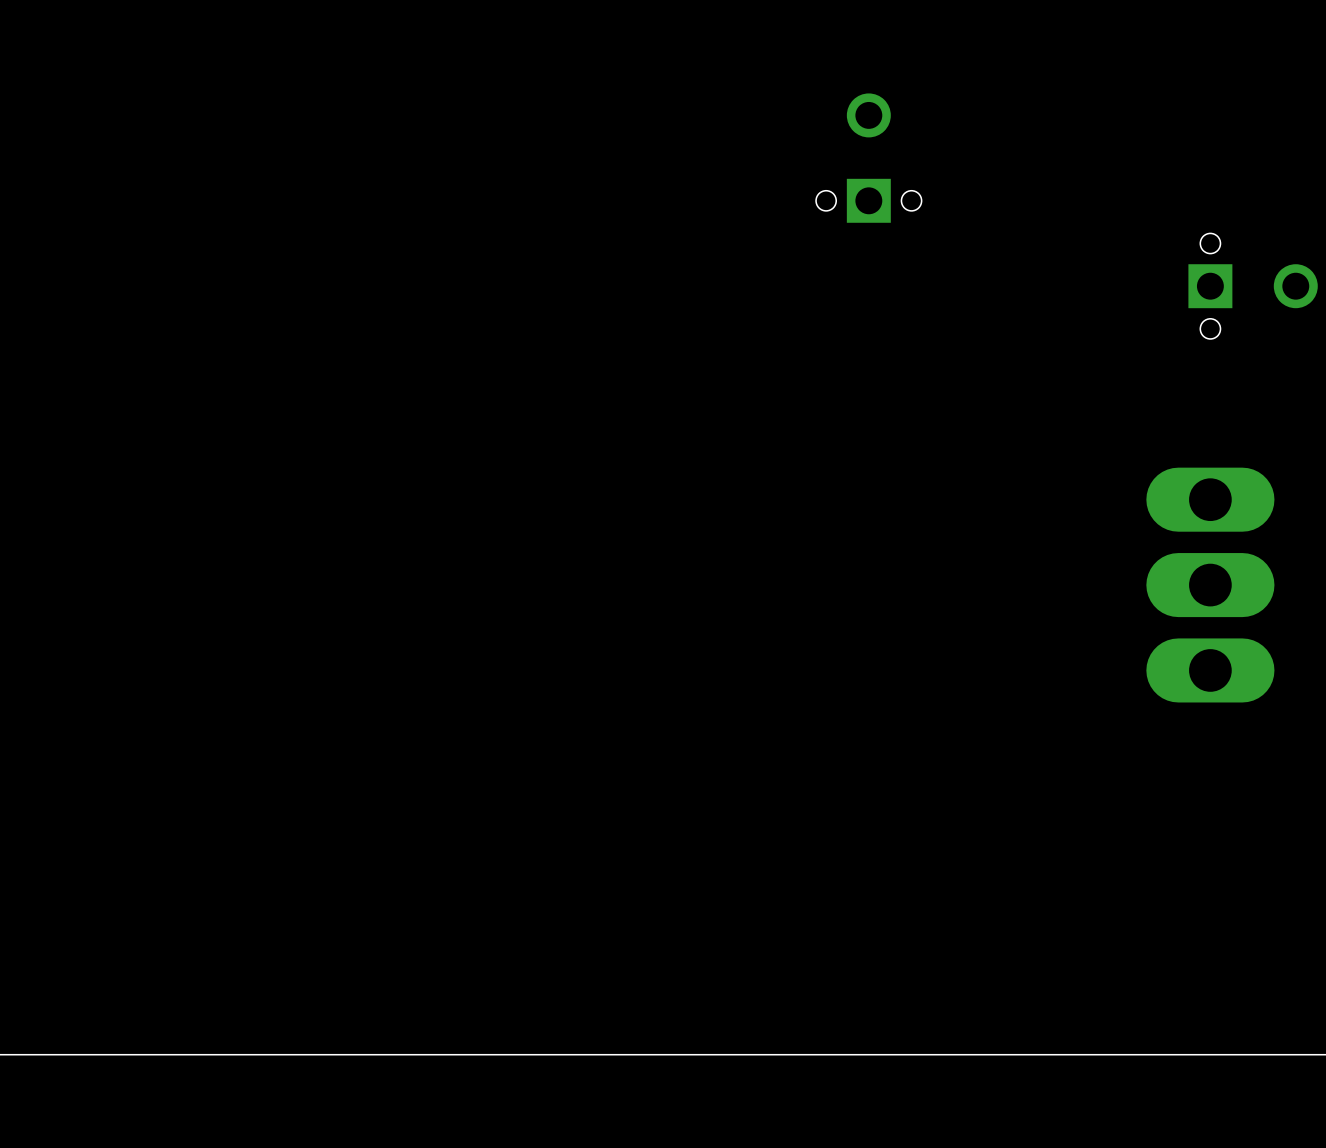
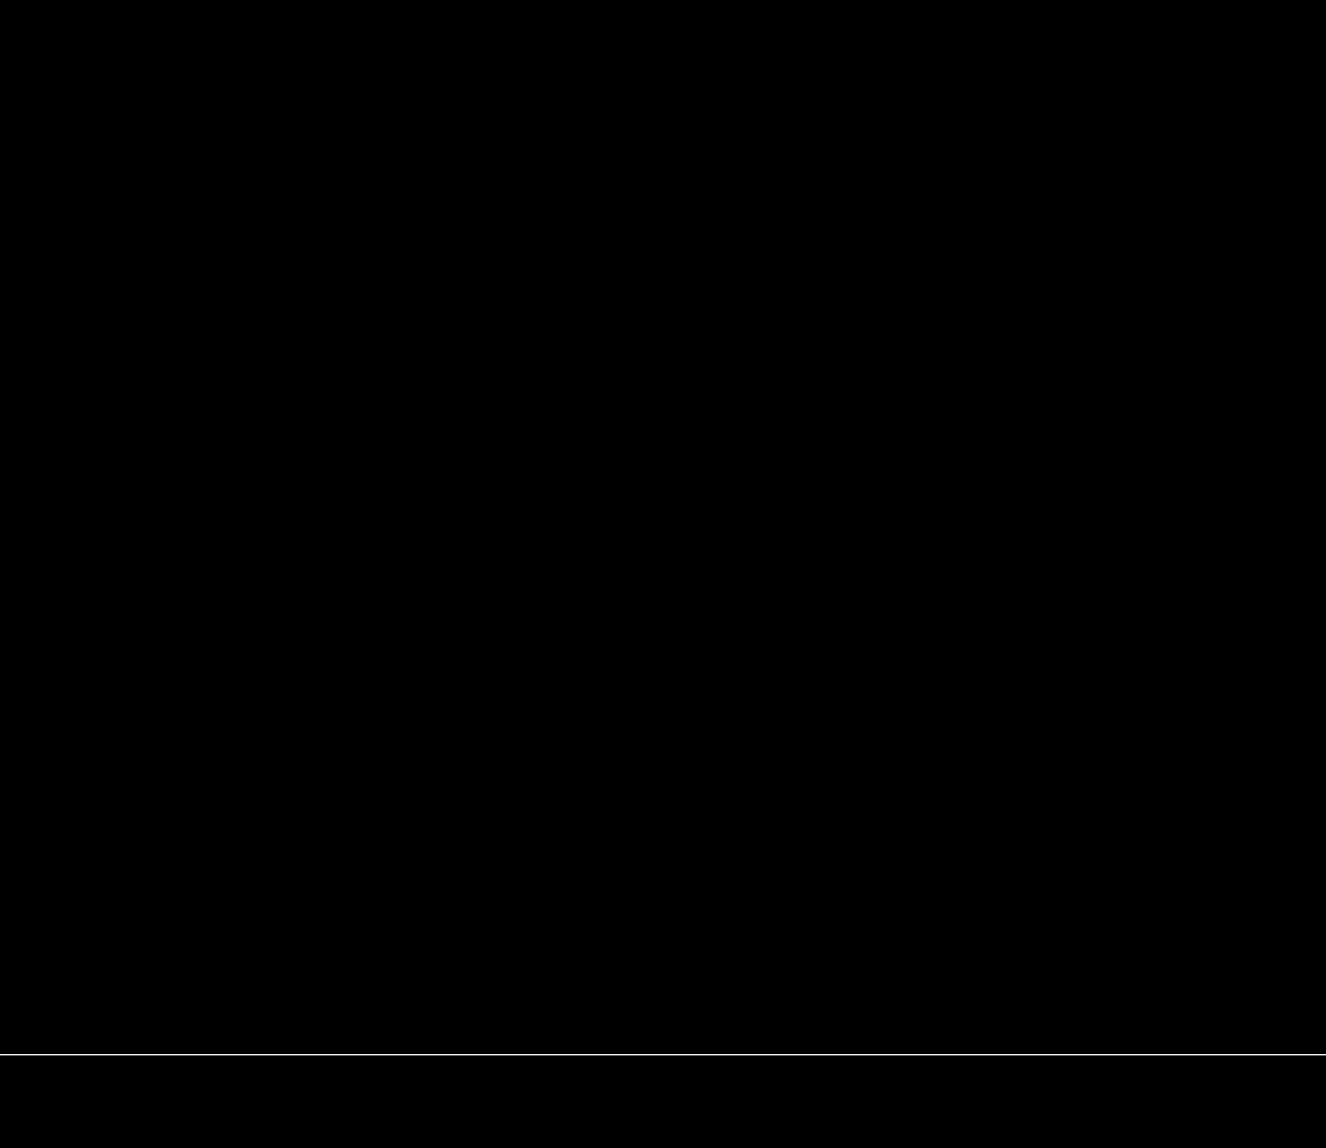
part: (868, 158) -> none
part: (1253, 286) -> none
part: (1210, 585) -> none

